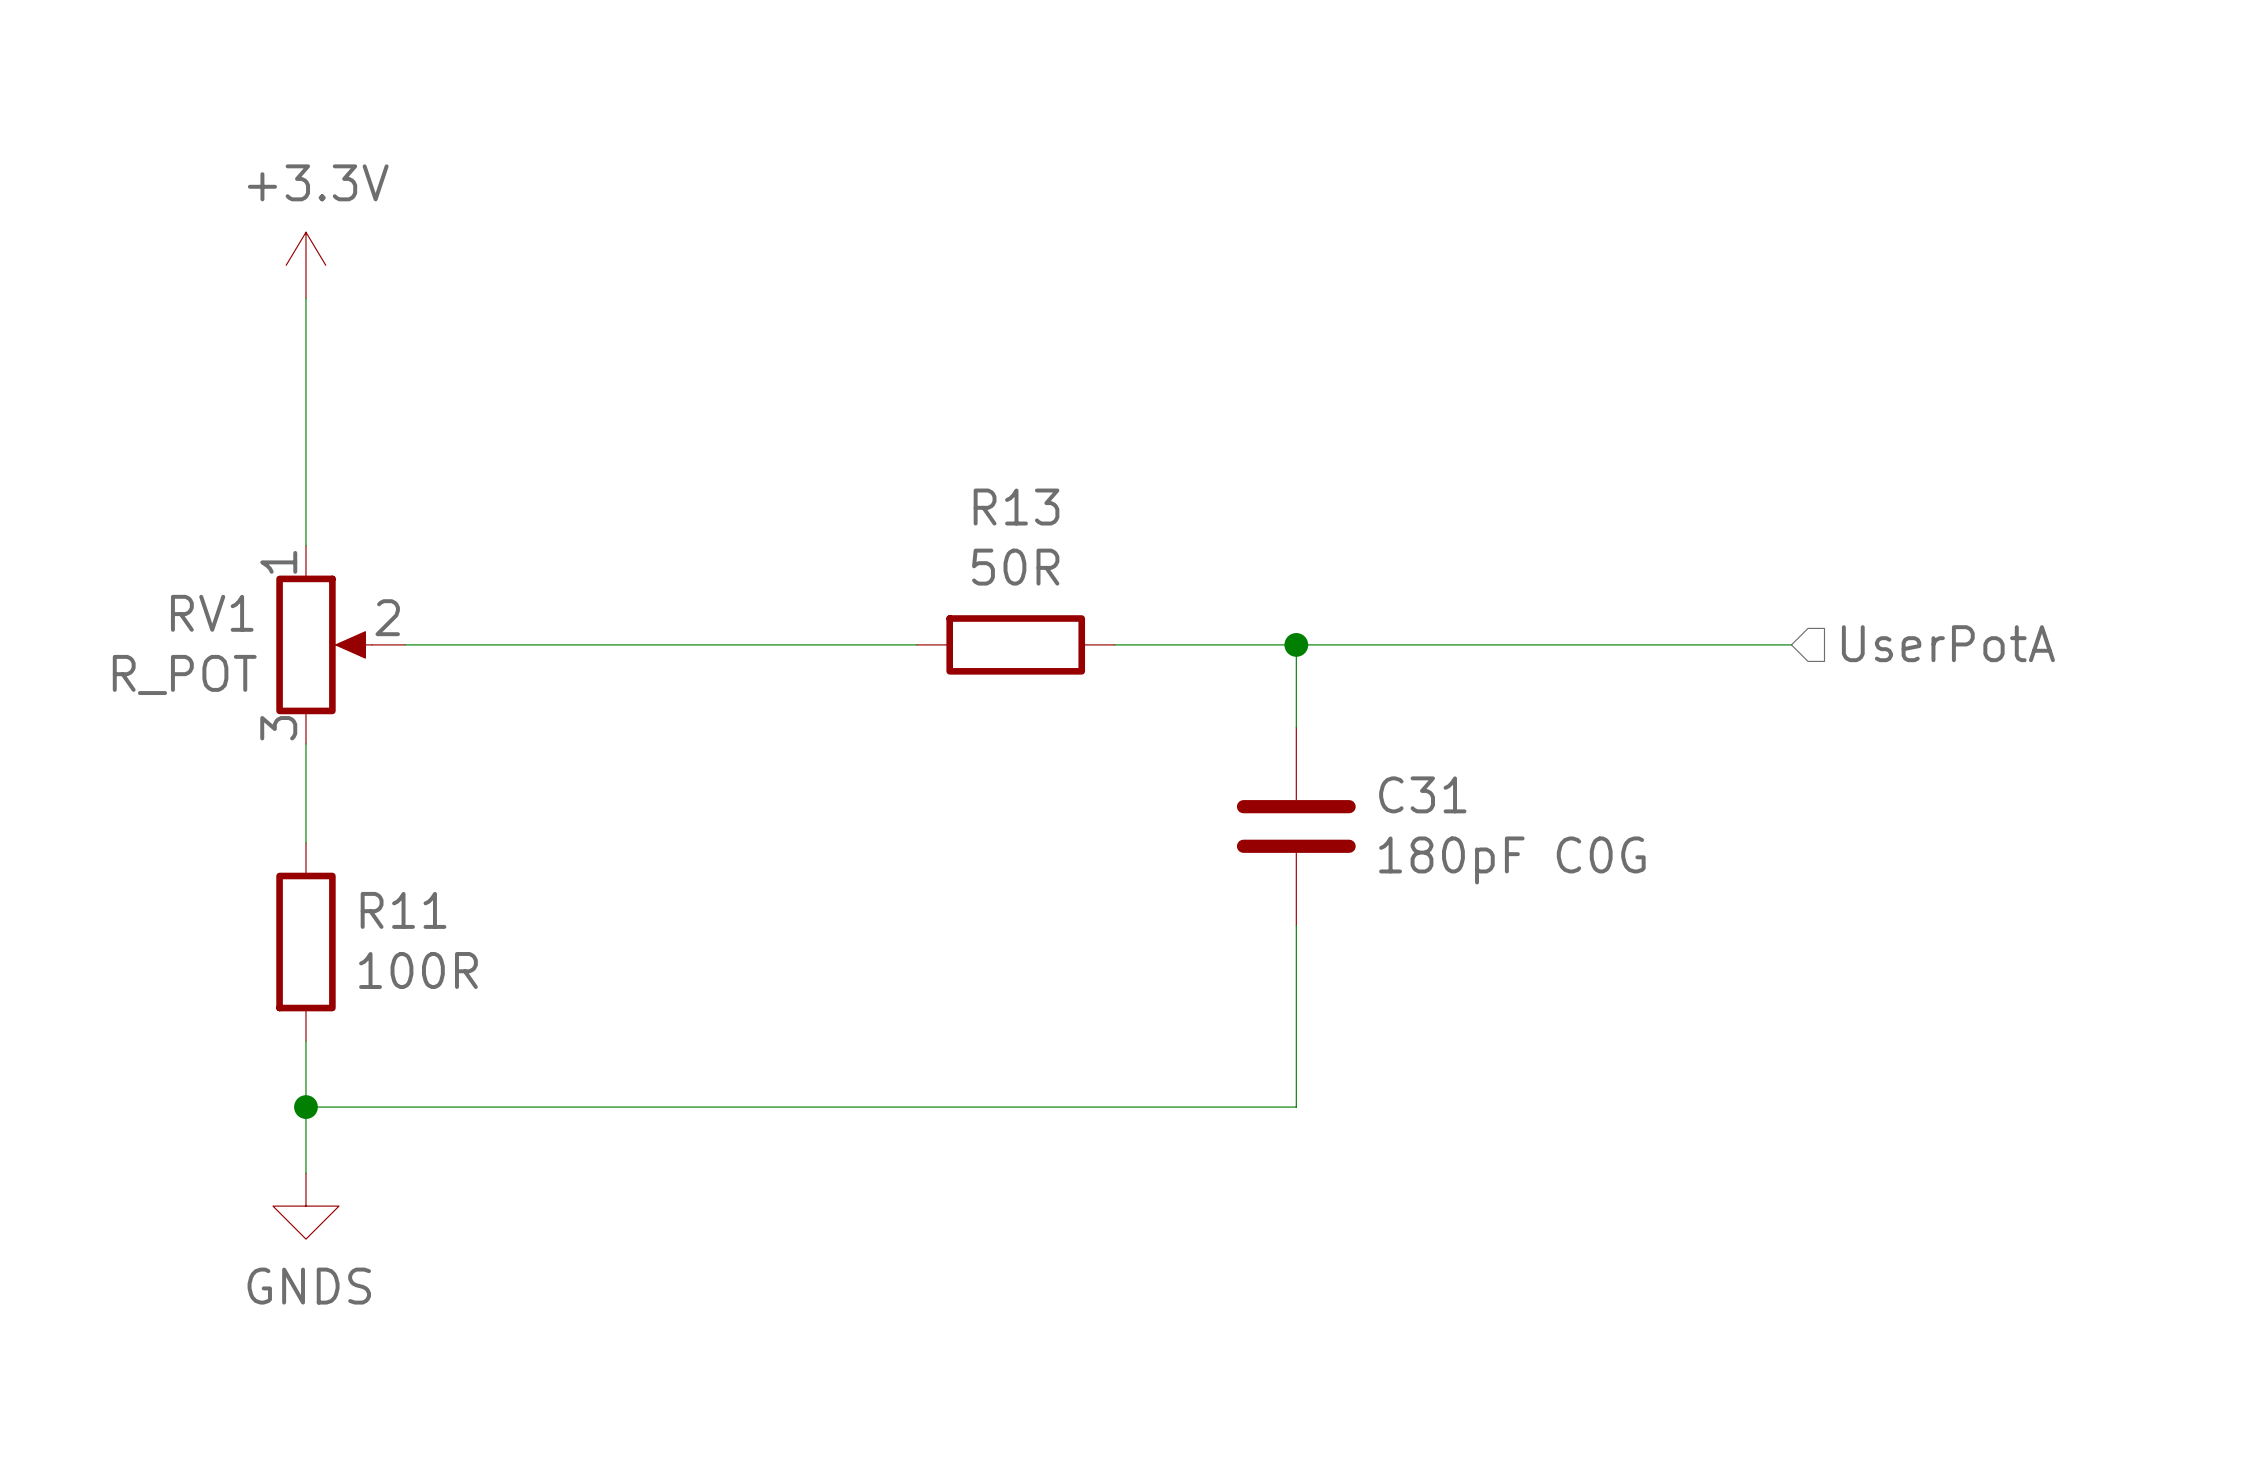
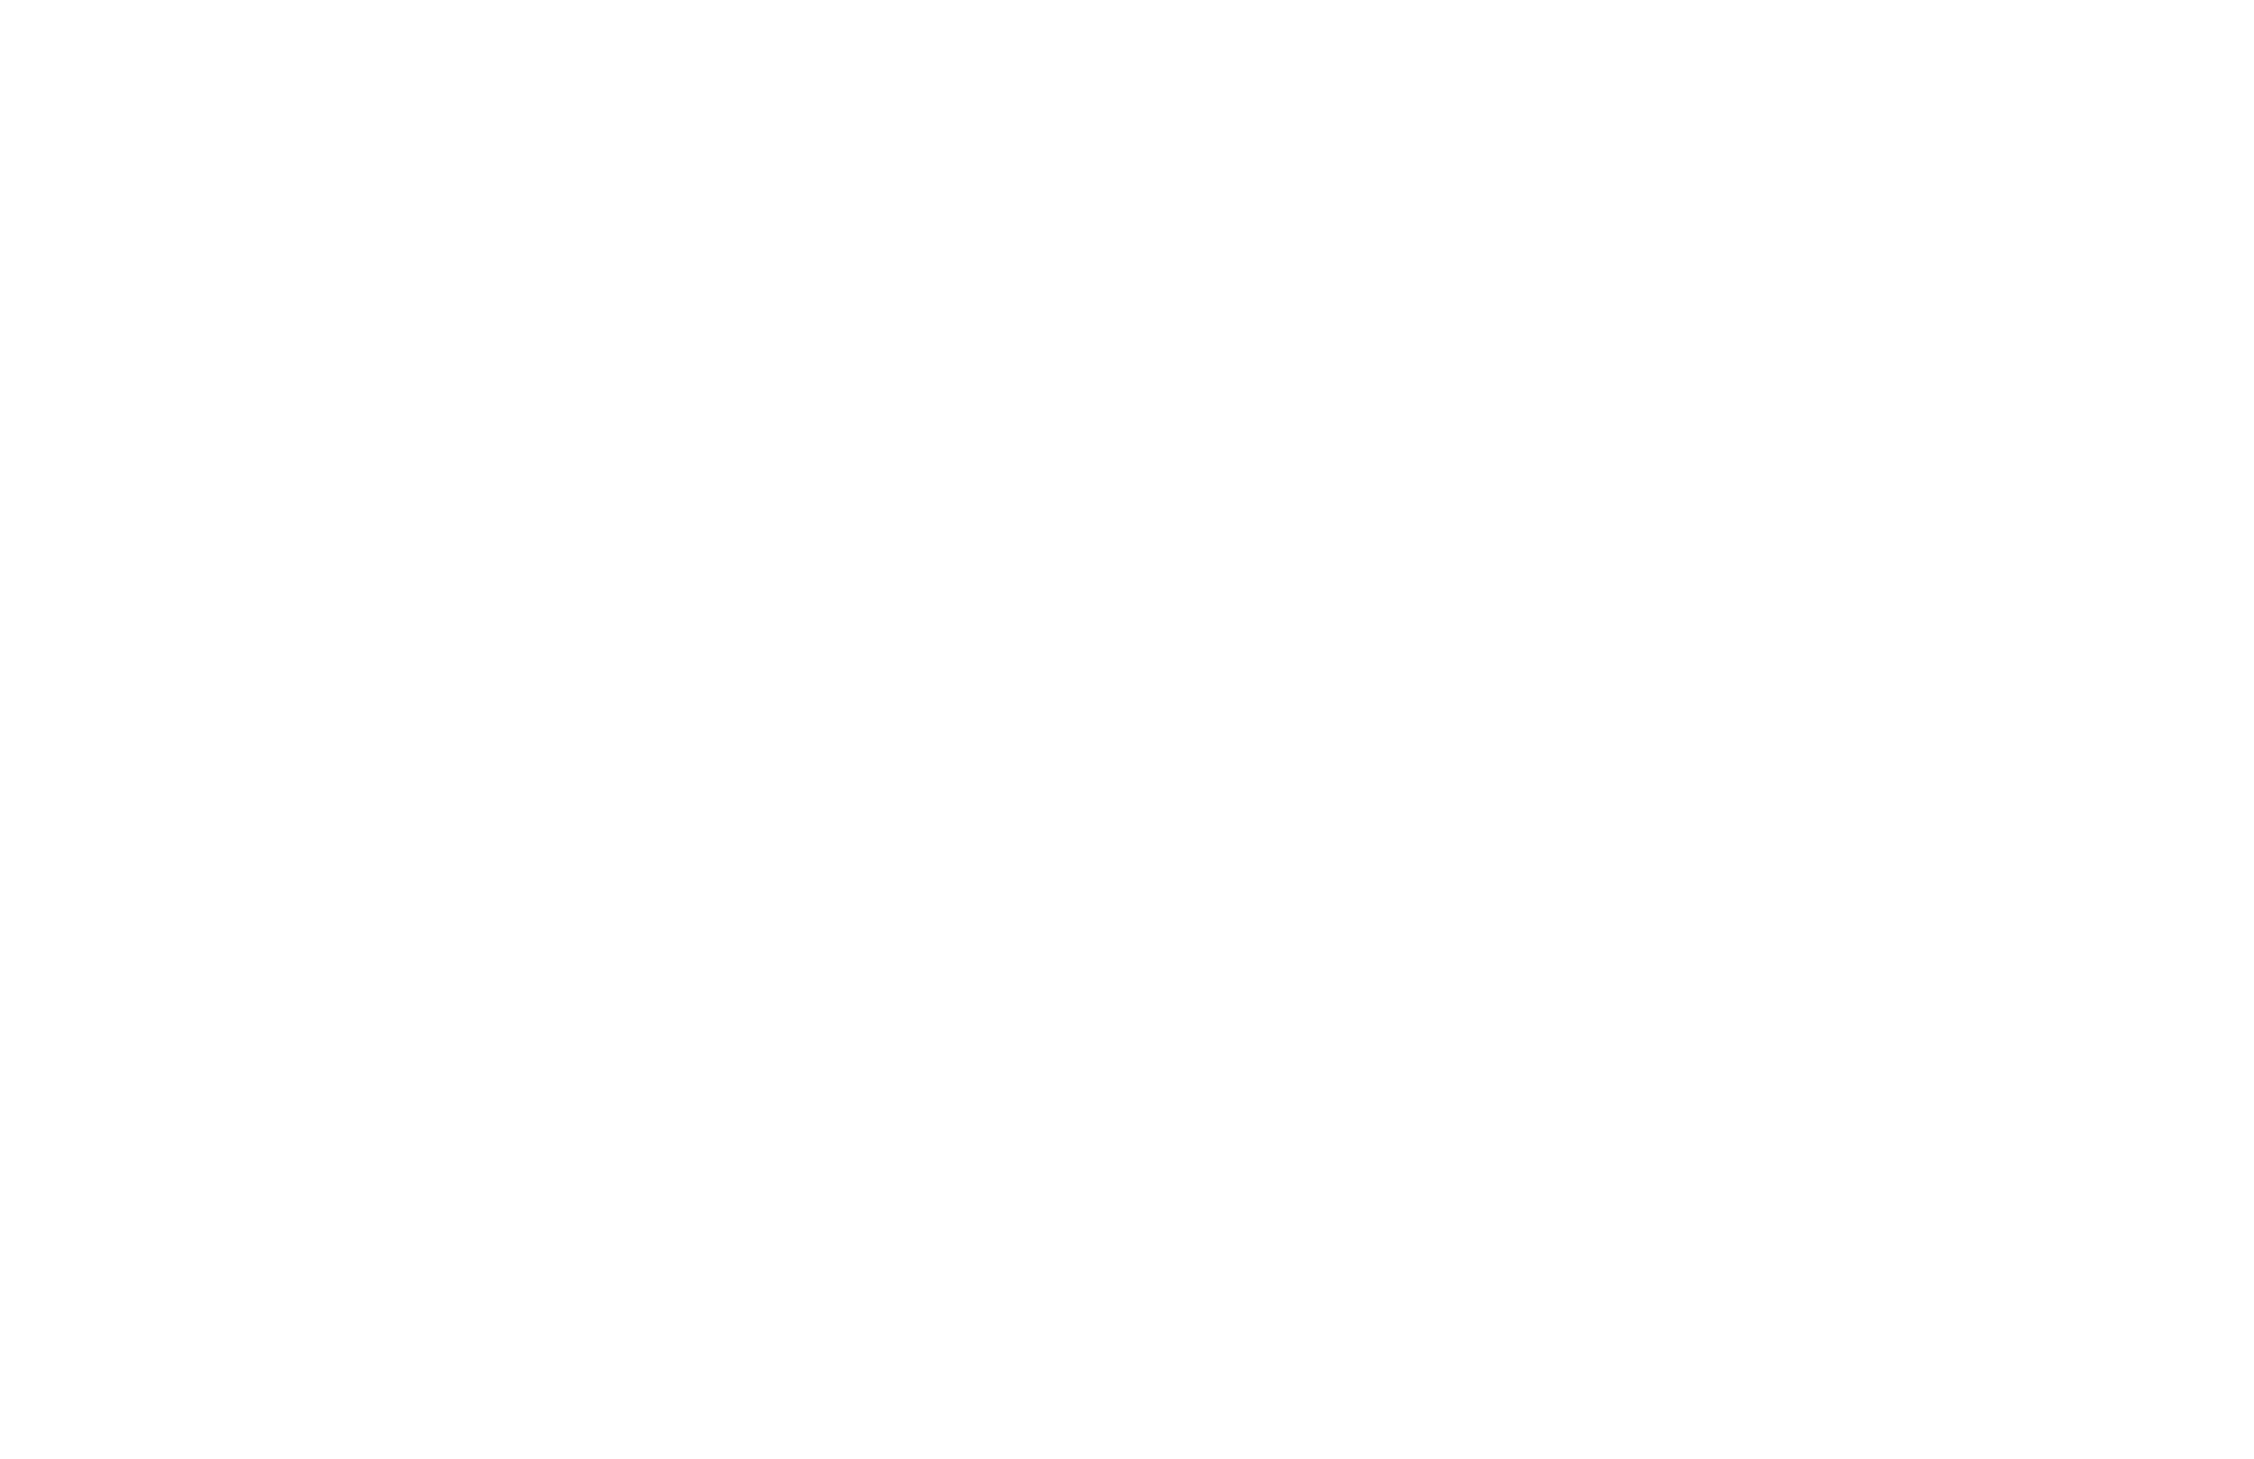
power symbol: +3.3V (305, 265) -> none
wire: (305, 298) (305, 545) -> none
hierarchical label: UserPotA (1948, 643) -> none
RV1: R_POT (340, 644) -> none
wire: (405, 644) (916, 644) -> none
R13: 50R (1015, 644) -> none
wire: (1114, 644) (1791, 644) -> none
wire: (1296, 644) (1296, 727) -> none
junction: (1296, 644) -> none
wire: (305, 743) (305, 842) -> none
C31: 180pF C0G (1296, 826) -> none
wire: (1296, 925) (1296, 1107) (305, 1107) -> none
R11: 100R (305, 942) -> none
wire: (305, 1041) (305, 1173) -> none
junction: (305, 1107) -> none
power symbol: GNDS (305, 1206) -> none

